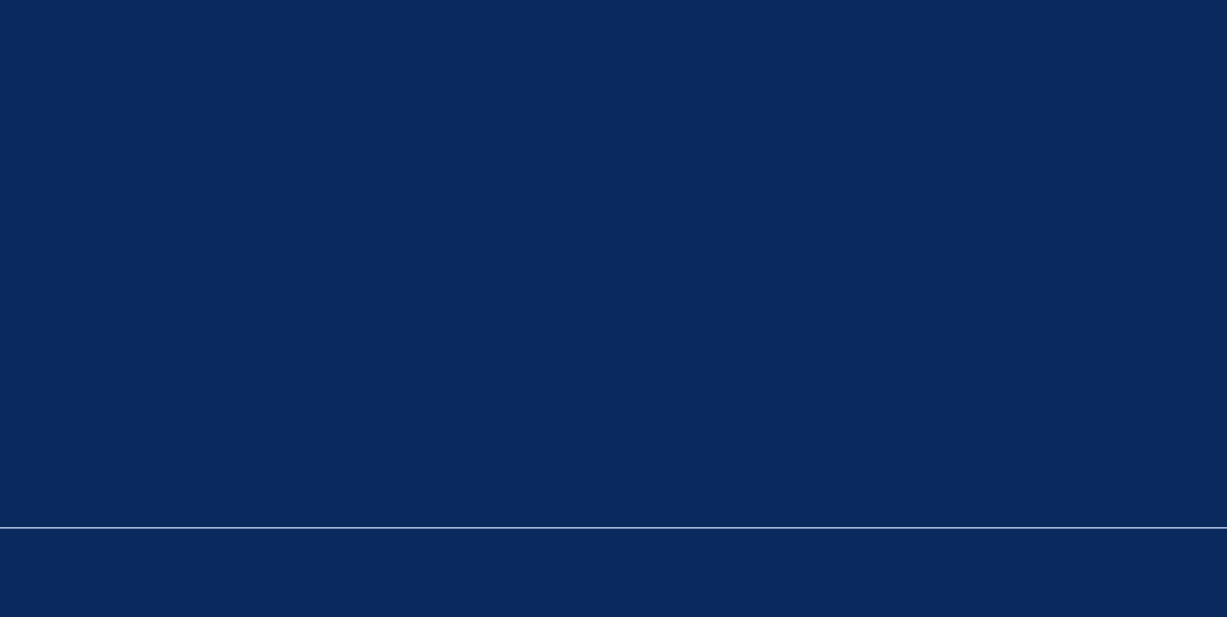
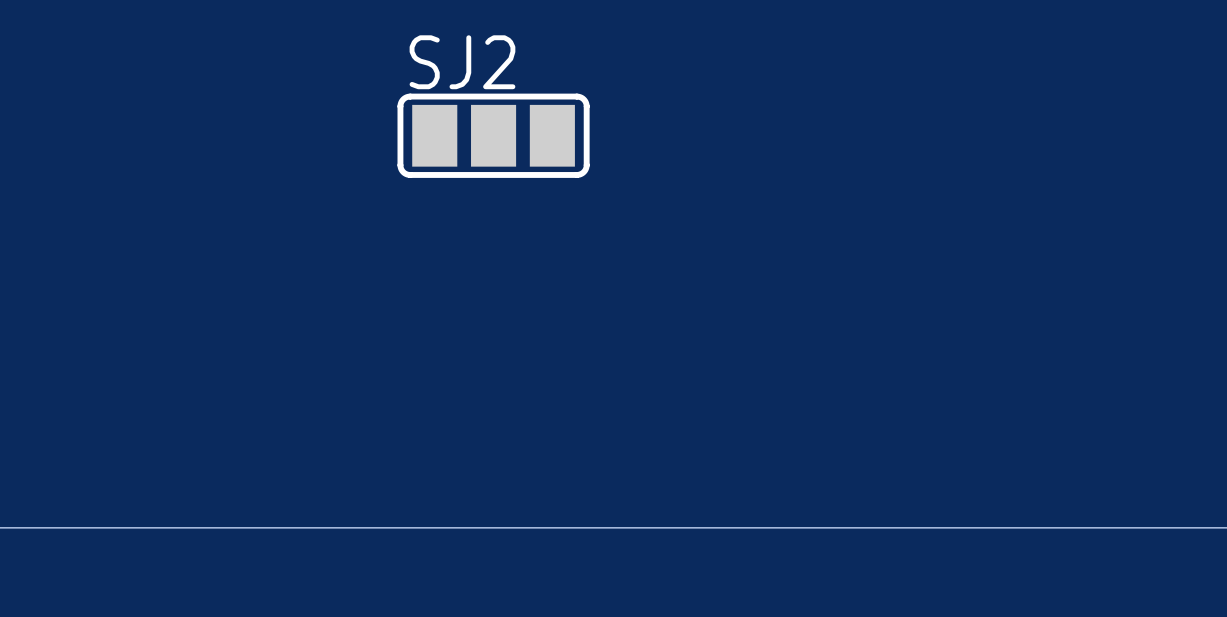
SJ2: none -> (493, 135)

